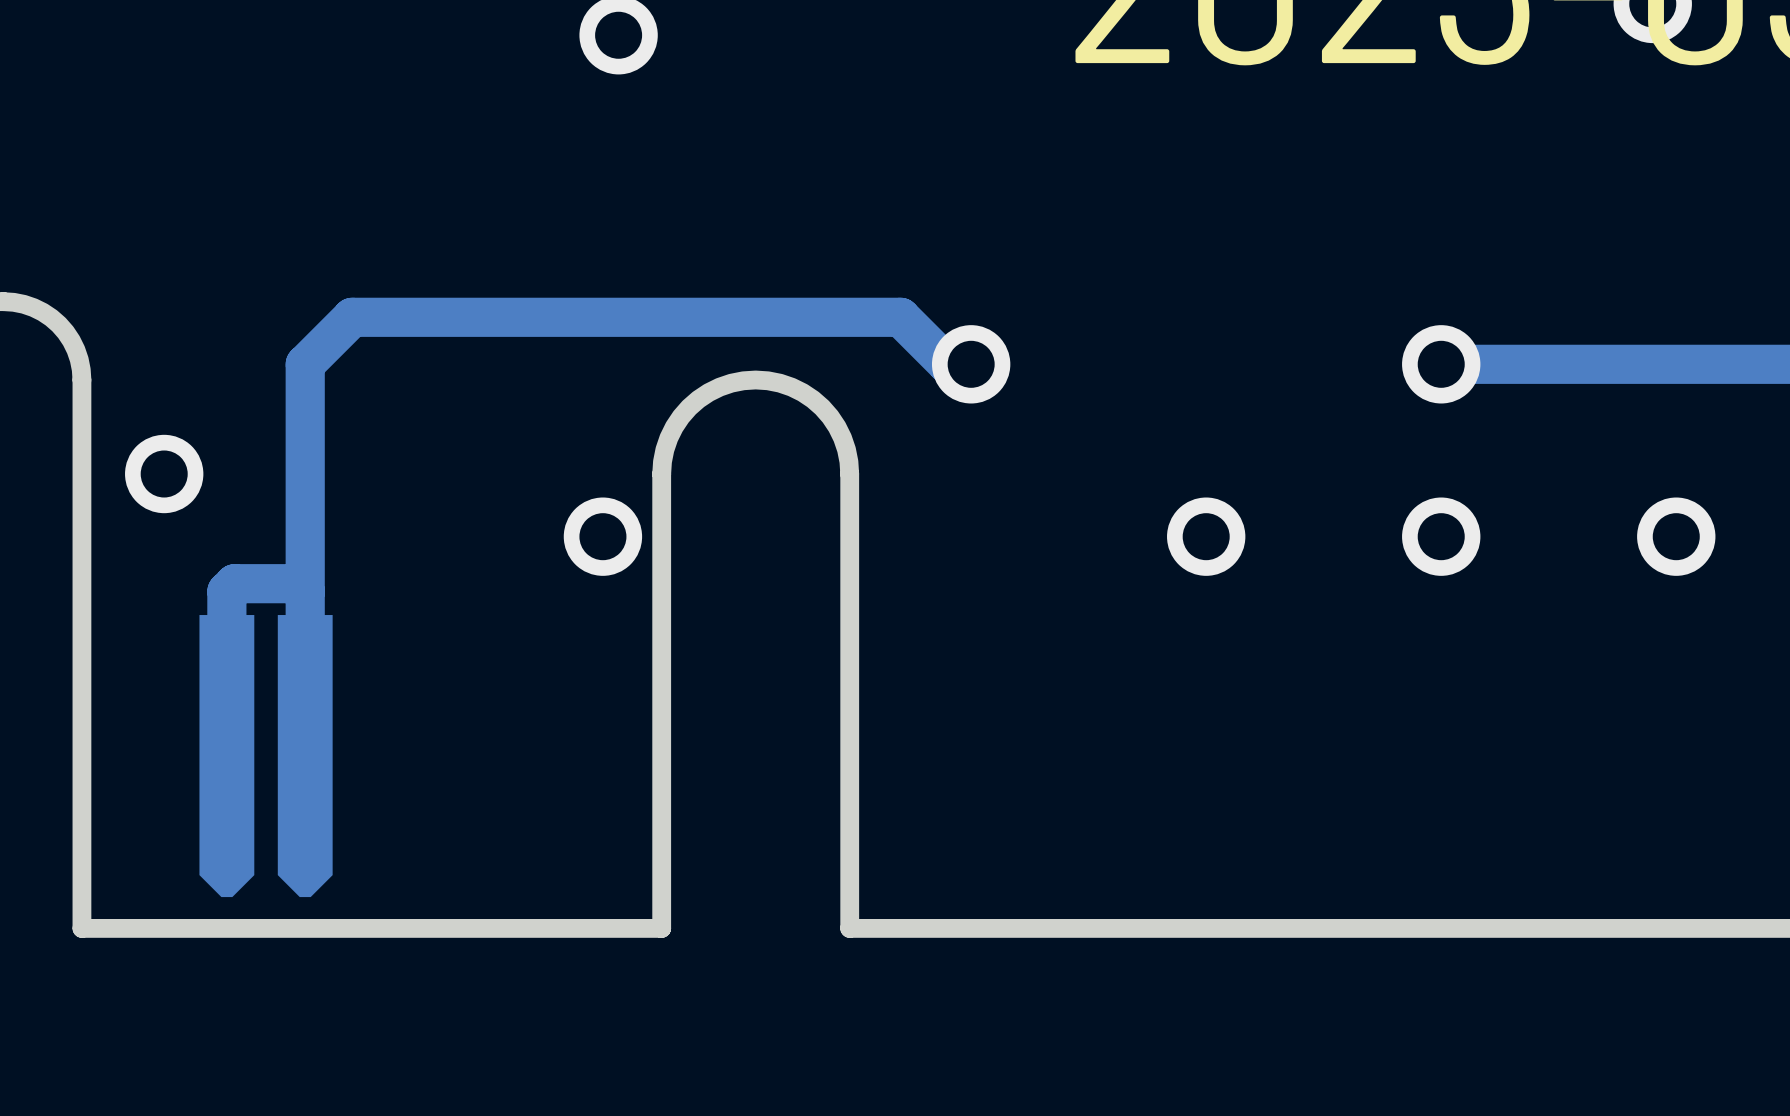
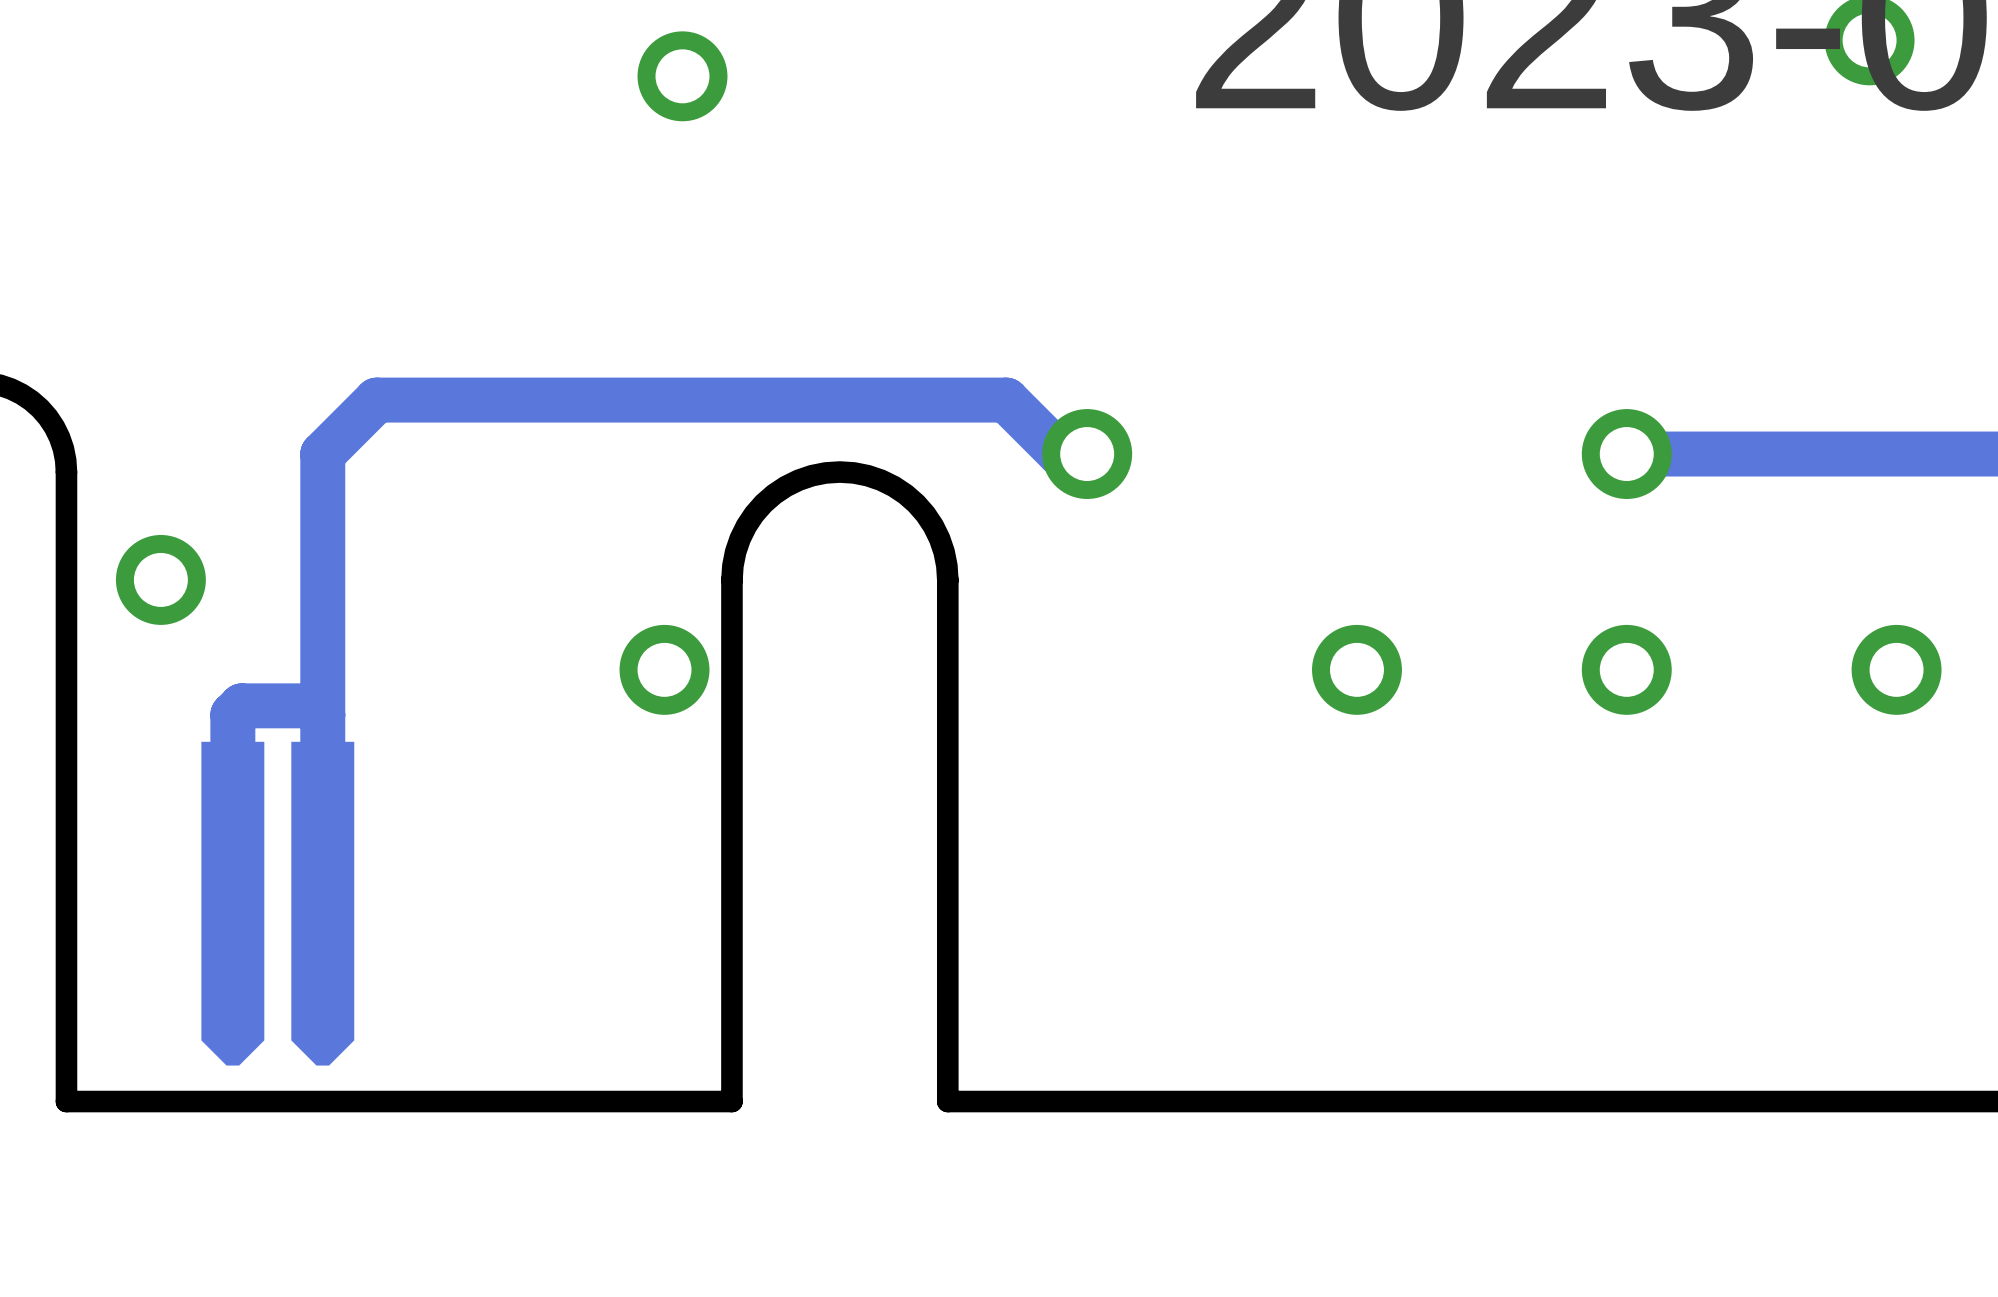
via position: (602, 536) -> (664, 669)
via position: (1206, 536) -> (1356, 669)
via position: (1441, 536) -> (1626, 669)
via position: (1676, 536) -> (1896, 669)

